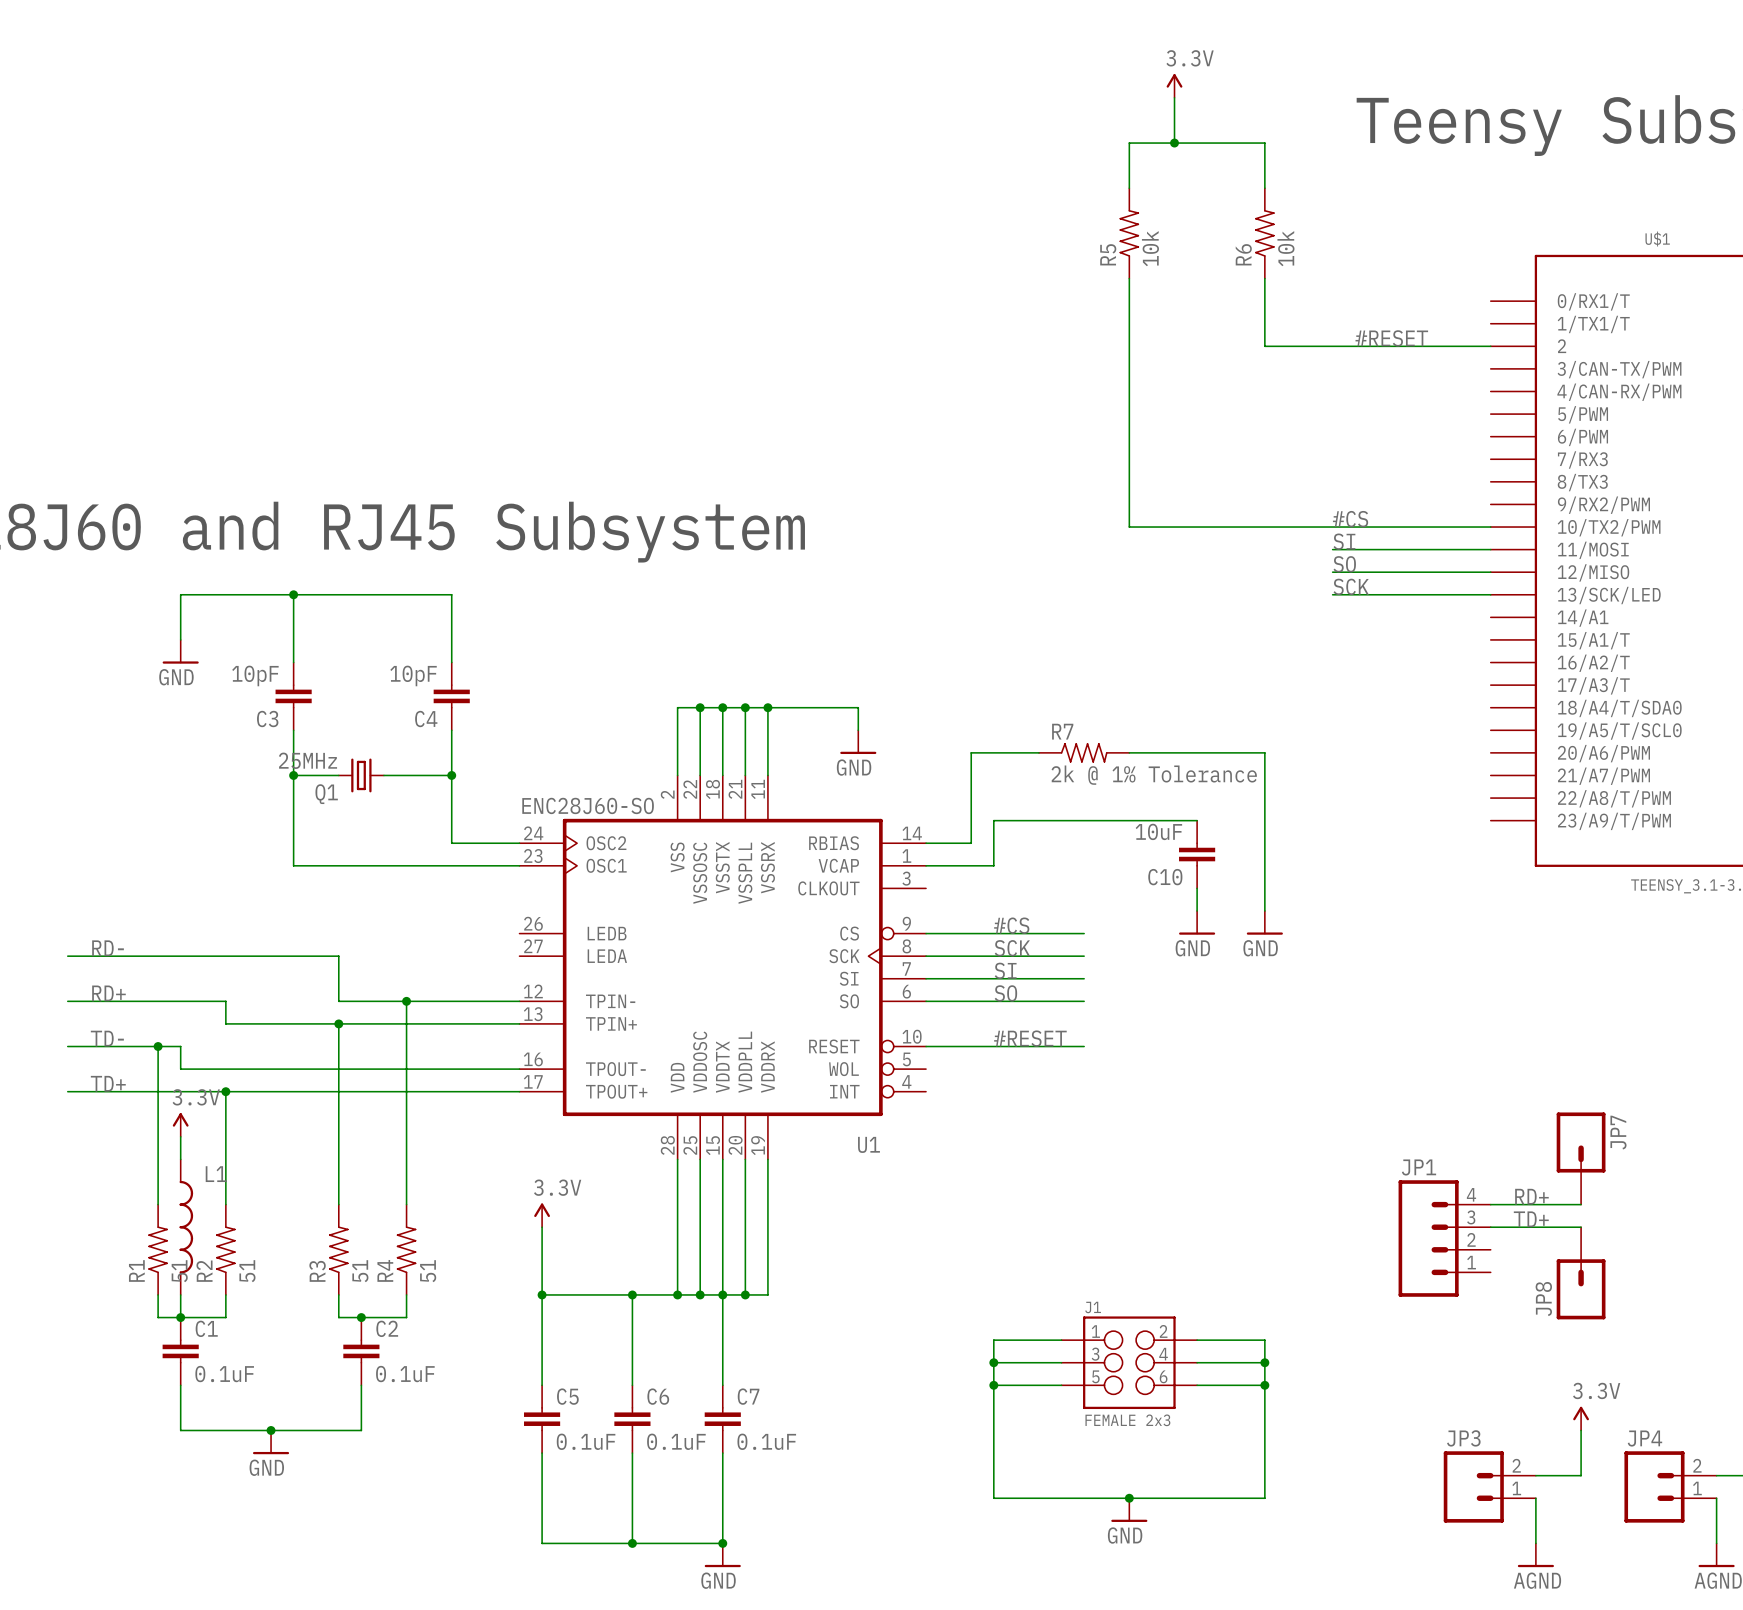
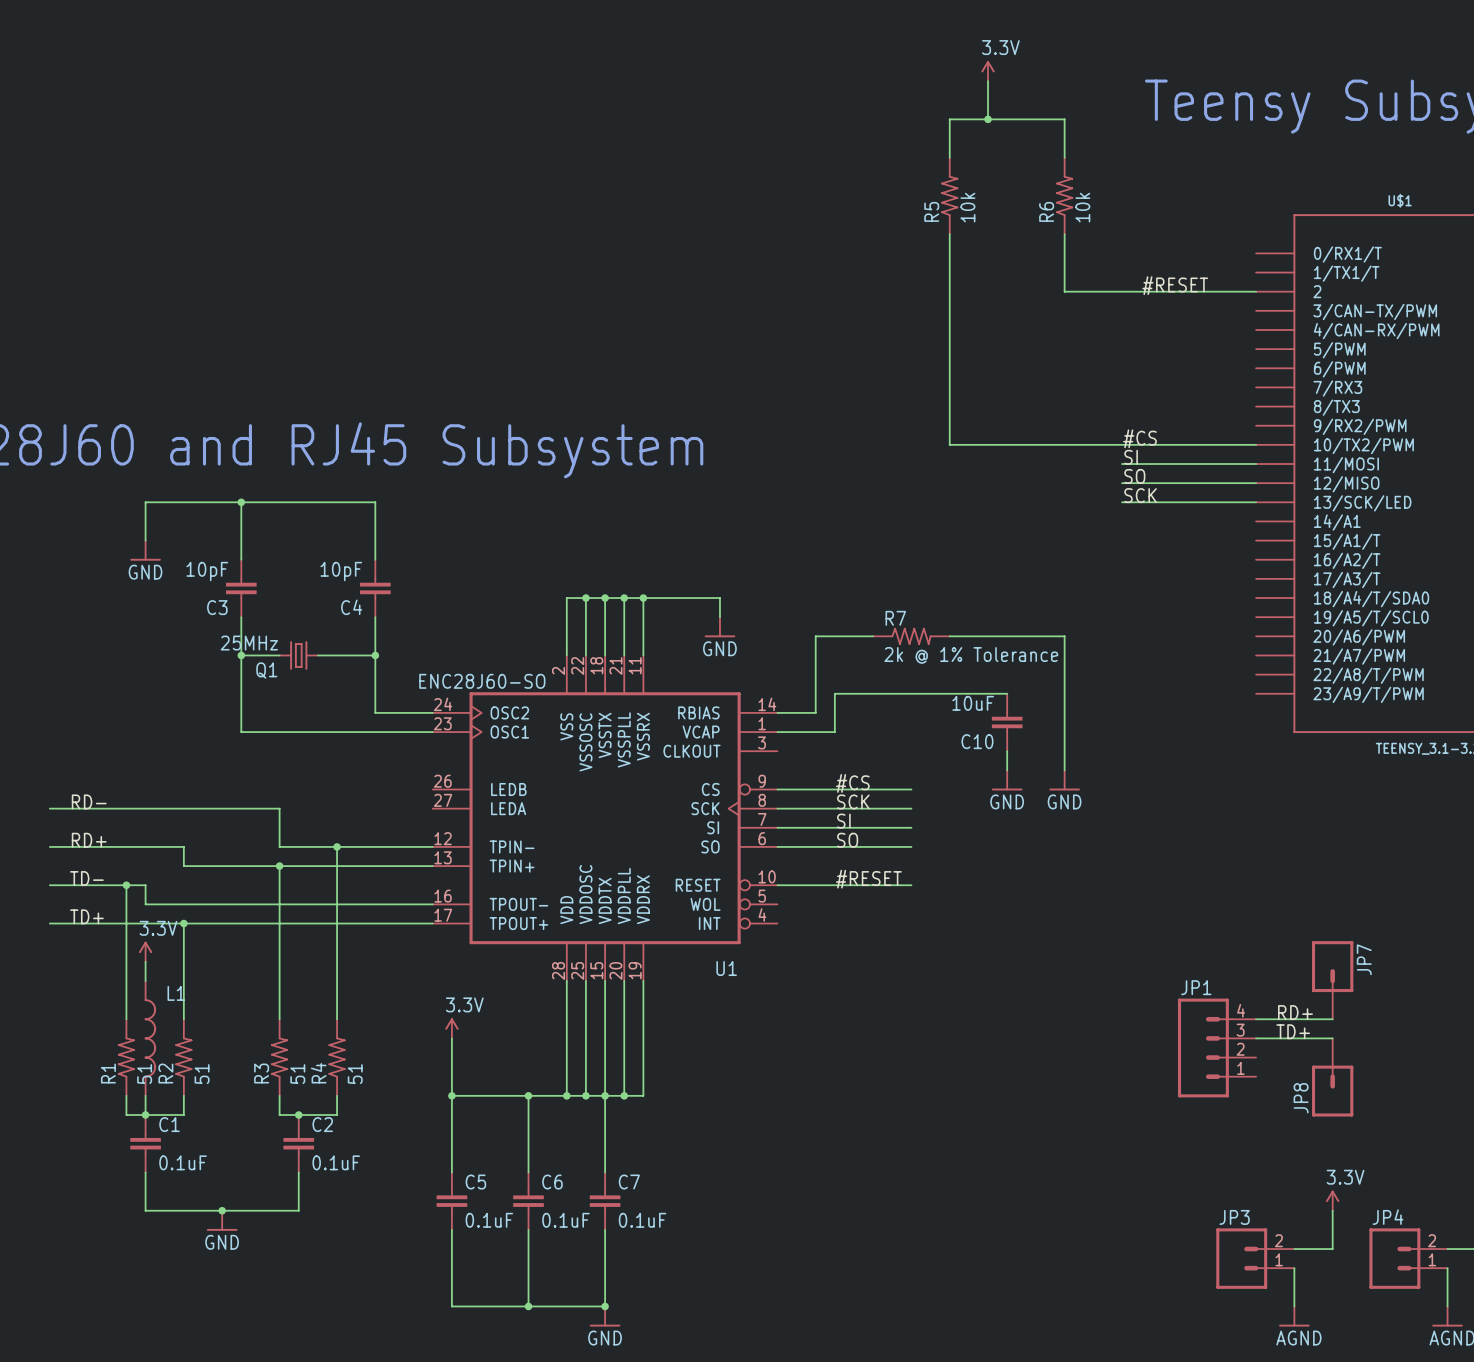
wire: (1061, 1340) (993, 1340) (993, 1498) (1264, 1498) (1264, 1340) (1197, 1340) -> none
wire: (993, 1362) (1061, 1362) -> none
junction: (993, 1362) -> none
J1: FEMALE 2x3 (1129, 1362) -> none
wire: (1197, 1362) (1264, 1362) -> none
junction: (1264, 1362) -> none
wire: (993, 1385) (1061, 1385) -> none
junction: (993, 1385) -> none
wire: (1197, 1385) (1264, 1385) -> none
junction: (1264, 1385) -> none
junction: (1129, 1498) -> none
power symbol: GND (1129, 1510) -> none

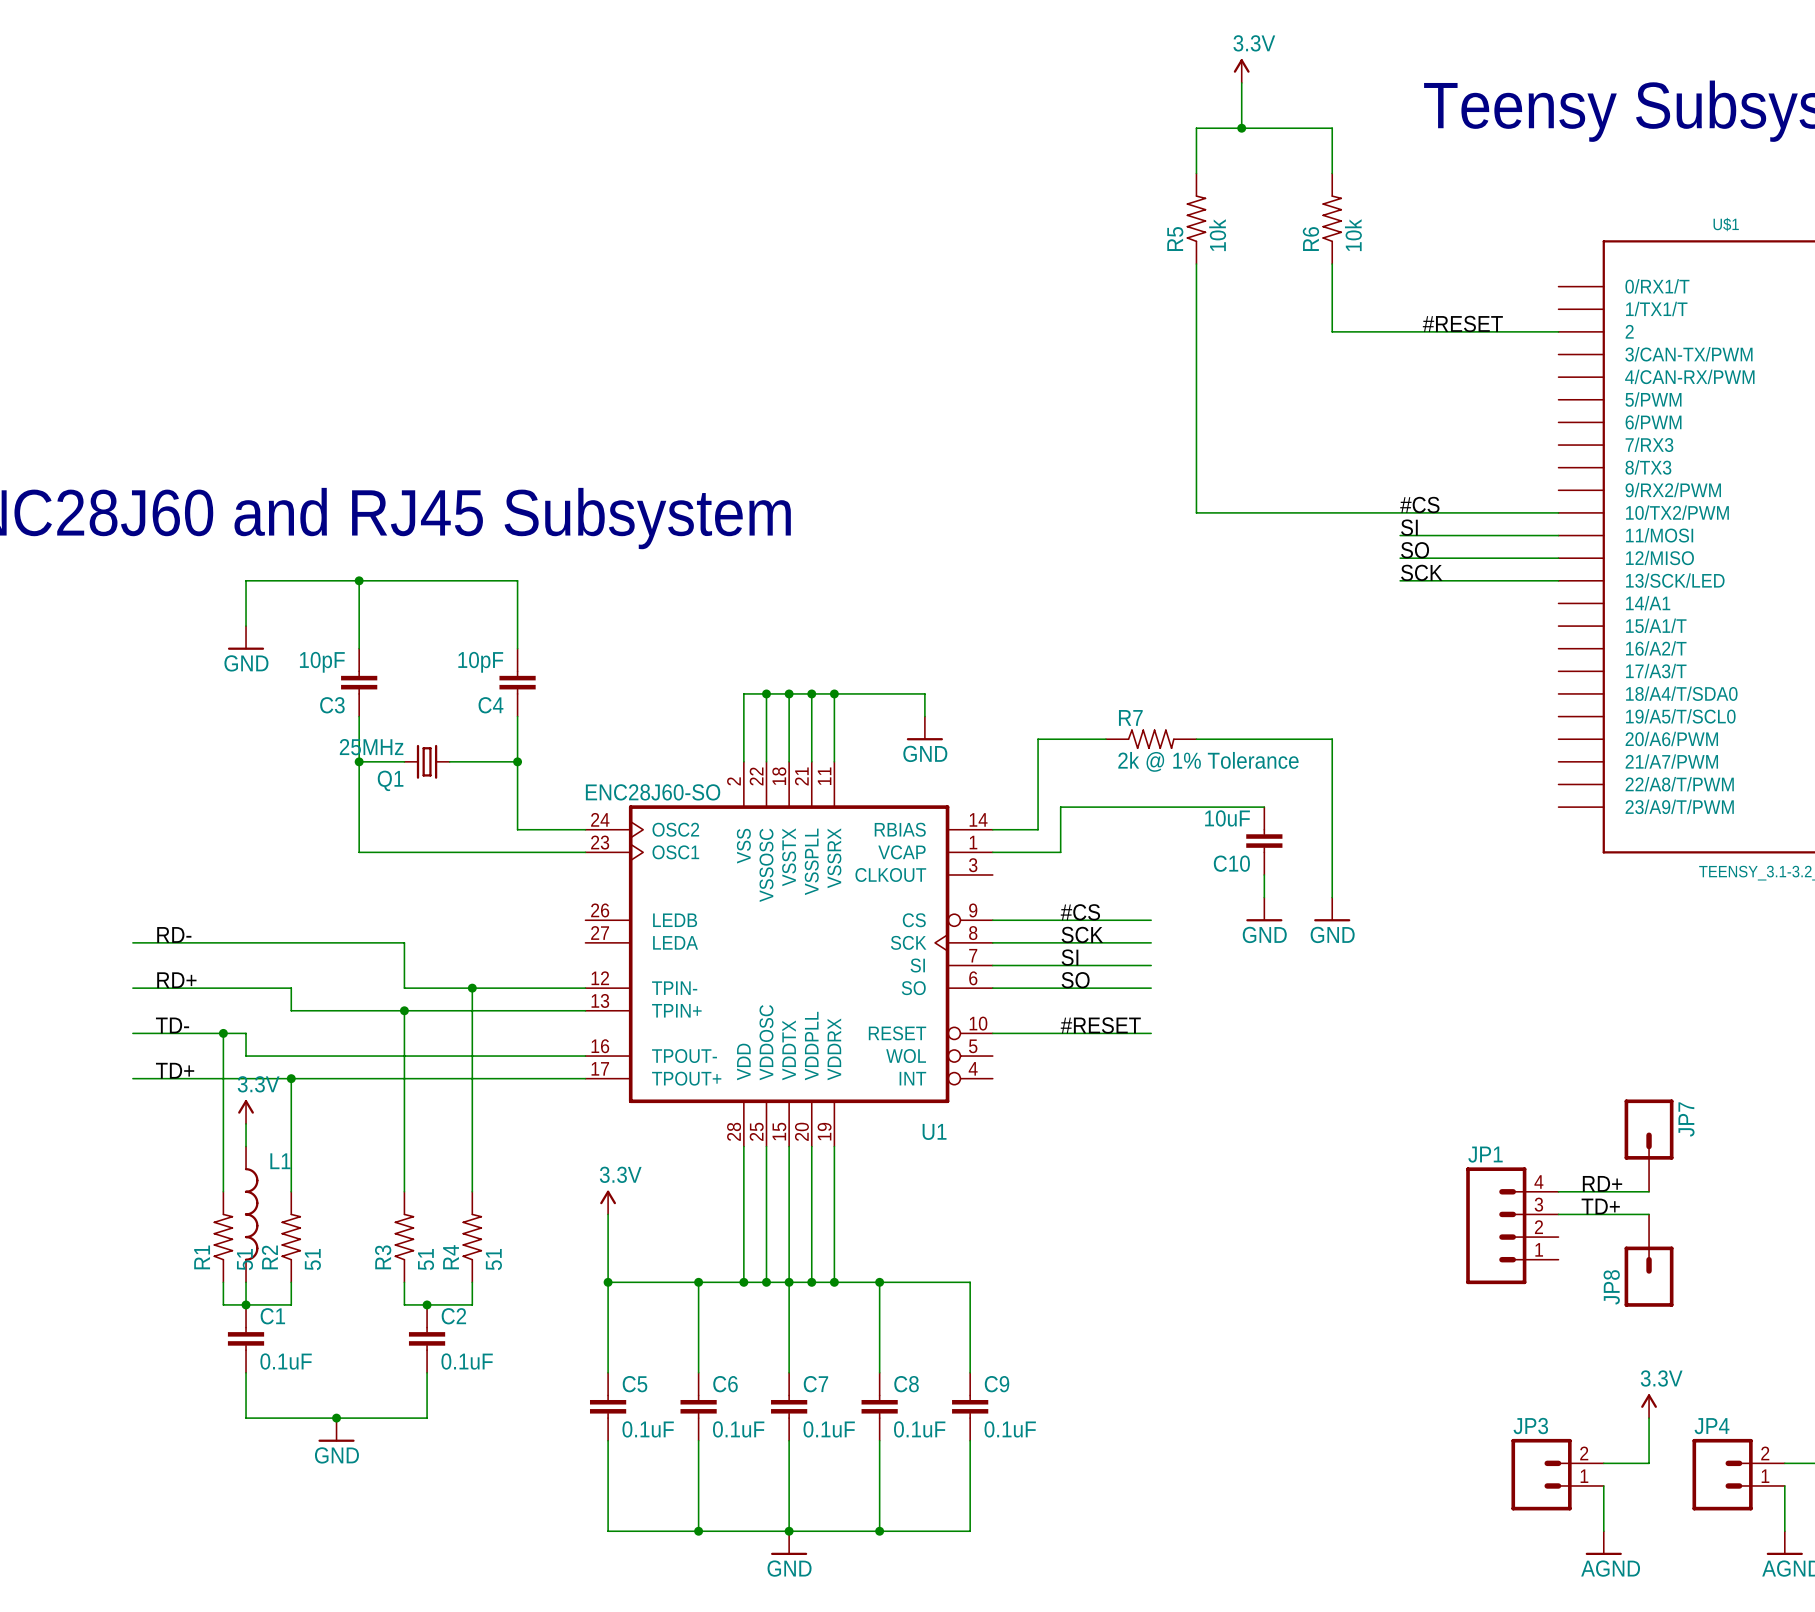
wire: none -> (834, 1282) (970, 1282) (970, 1372)
junction: none -> (834, 1282)
wire: none -> (879, 1282) (879, 1372)
junction: none -> (879, 1282)
C8: none -> 0.1uF (879, 1406)
C9: none -> 0.1uF (970, 1406)
wire: none -> (879, 1440) (879, 1531)
wire: none -> (970, 1440) (970, 1531) (789, 1531)
junction: none -> (879, 1531)

